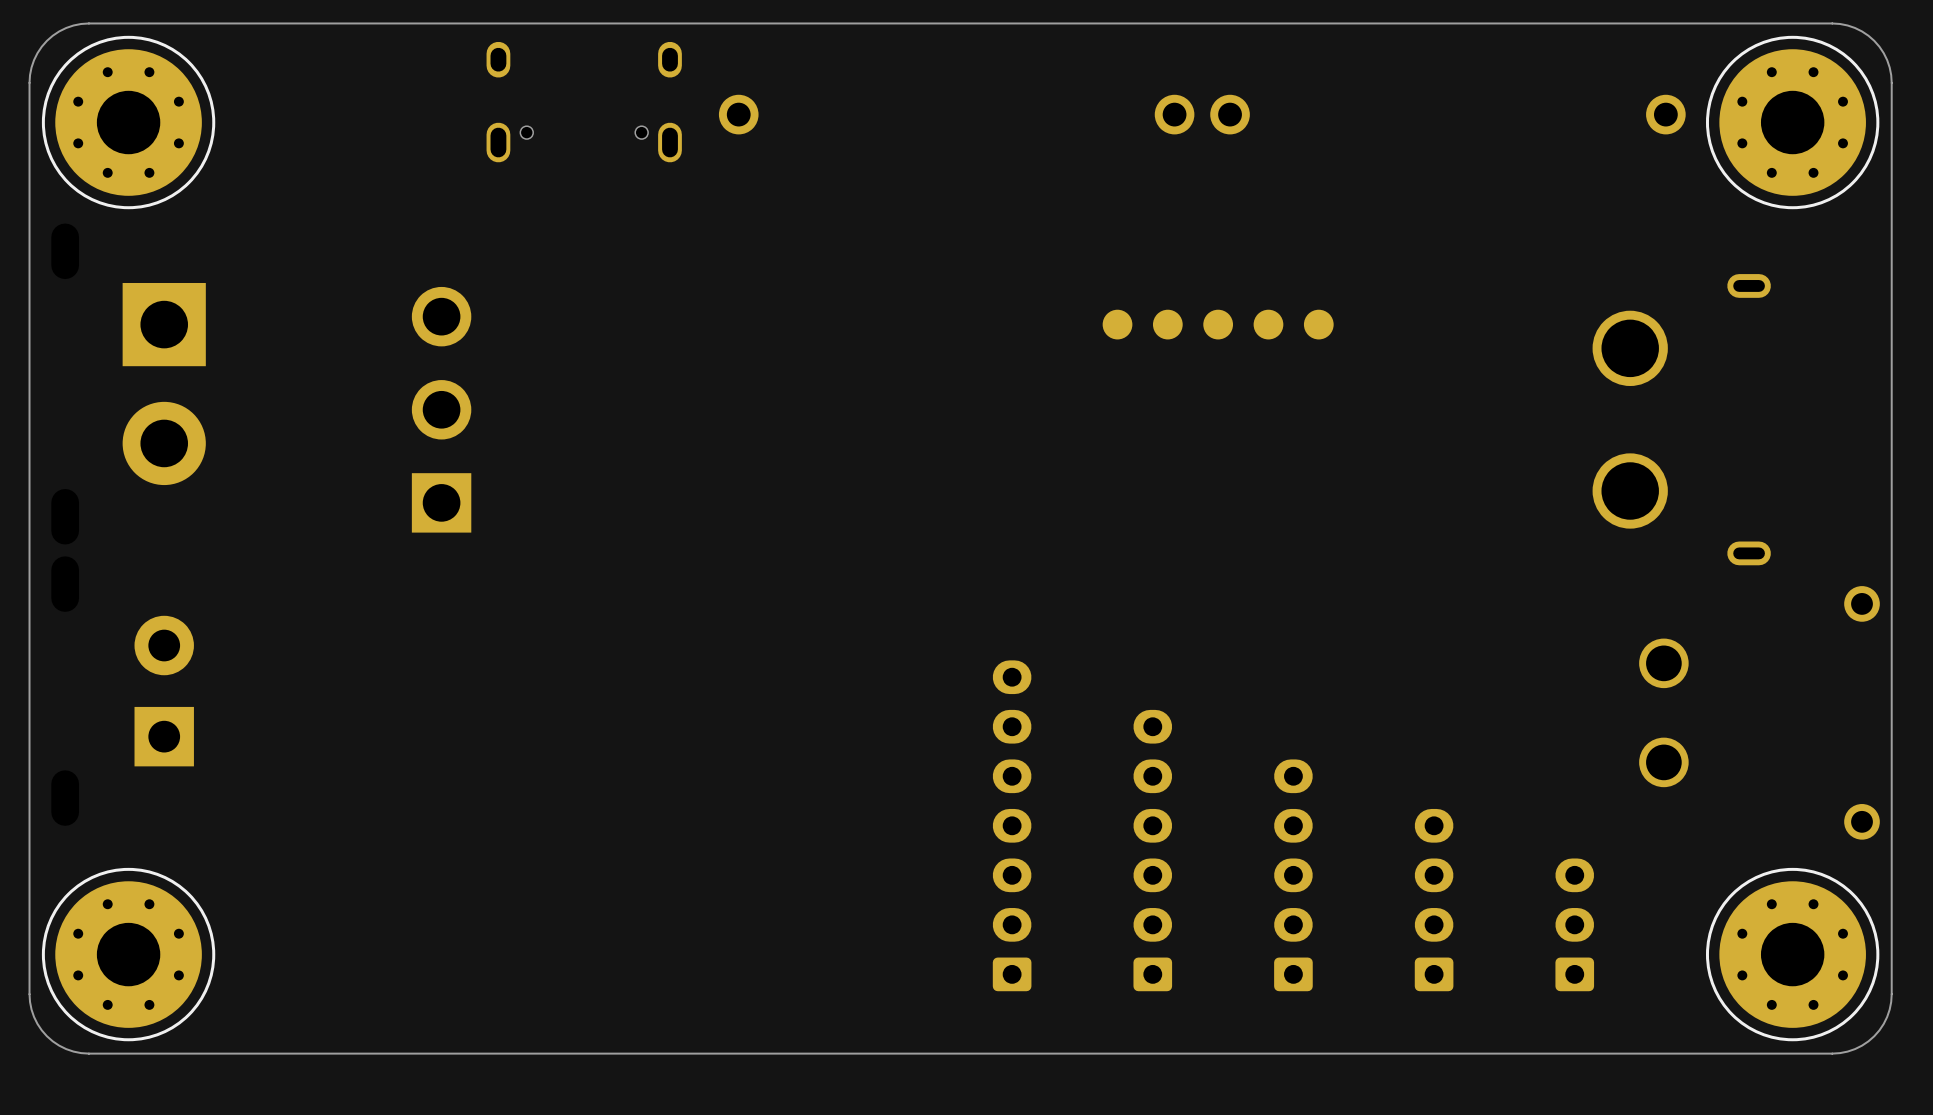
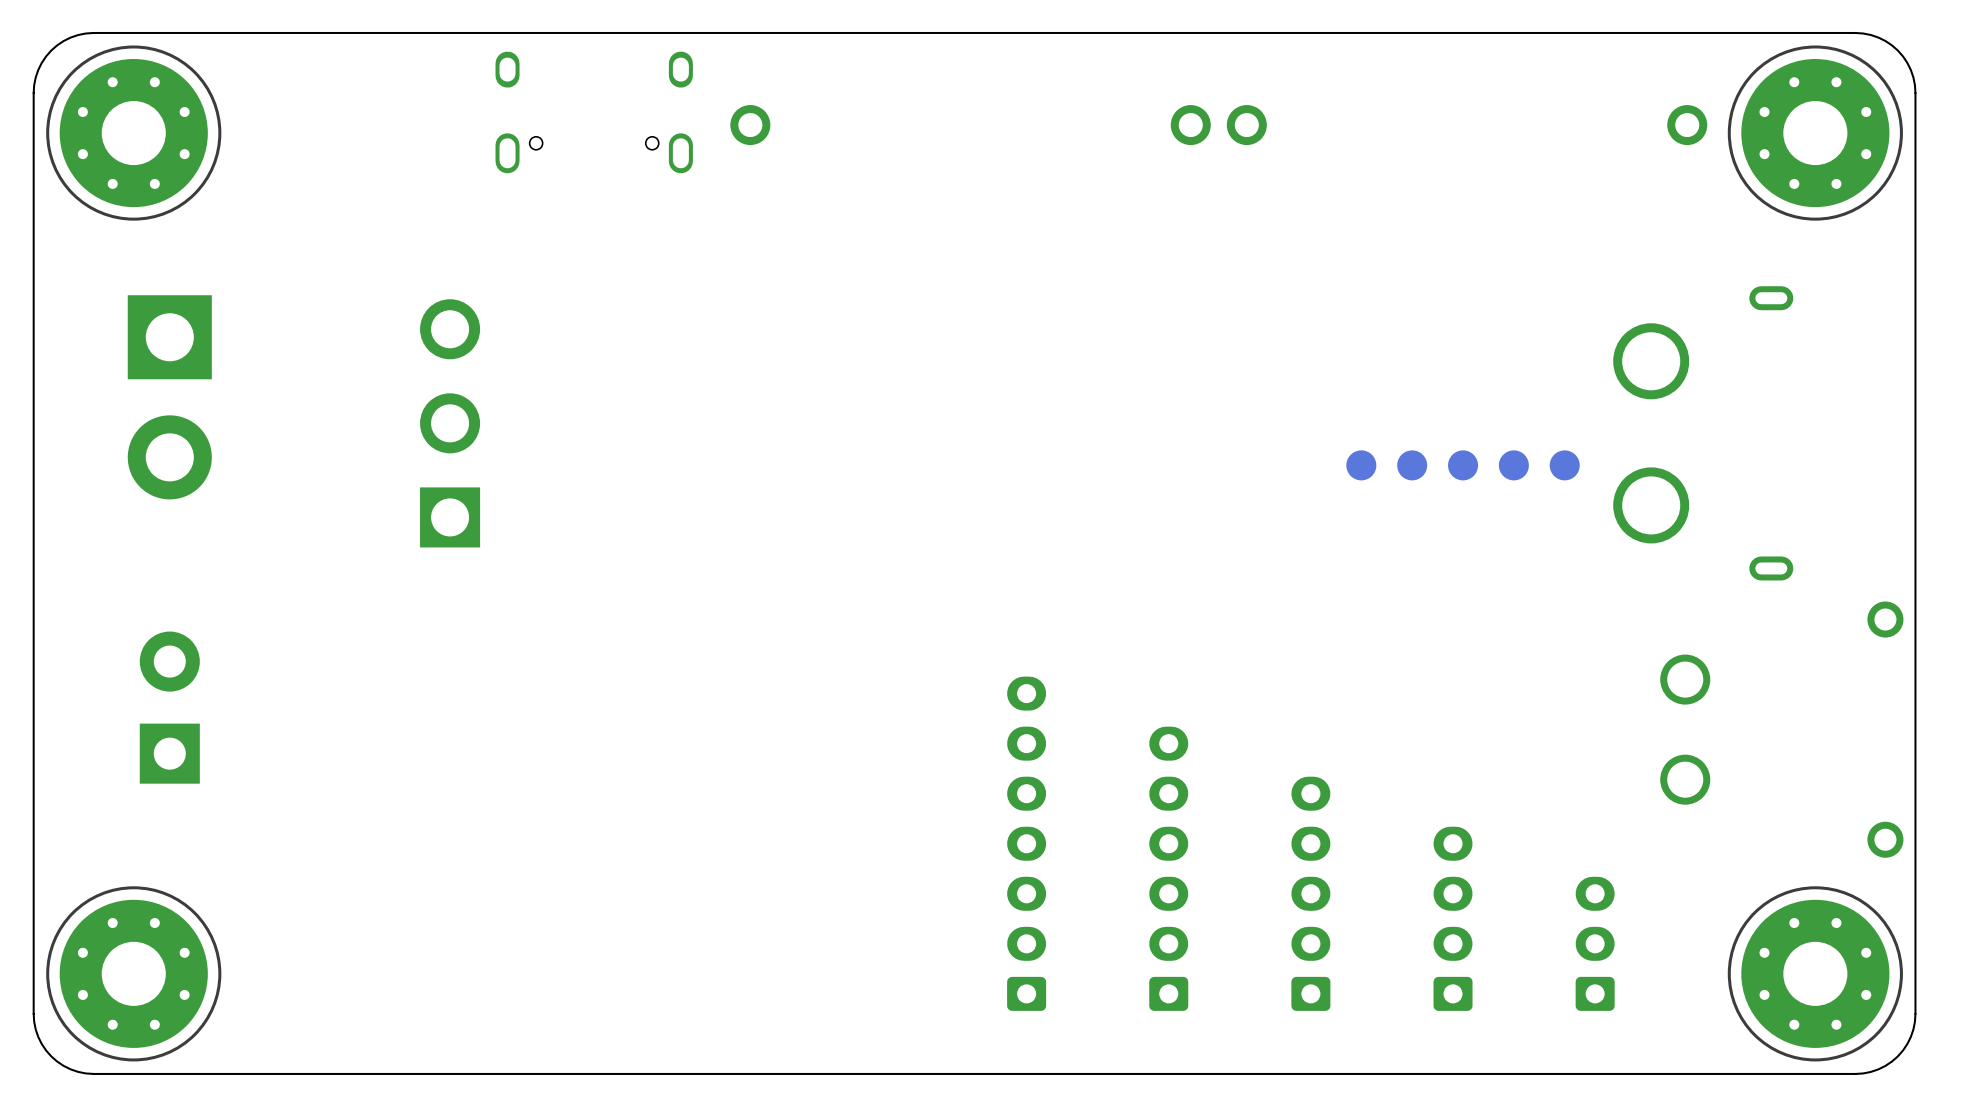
part position: (1218, 324) -> (1463, 465)

